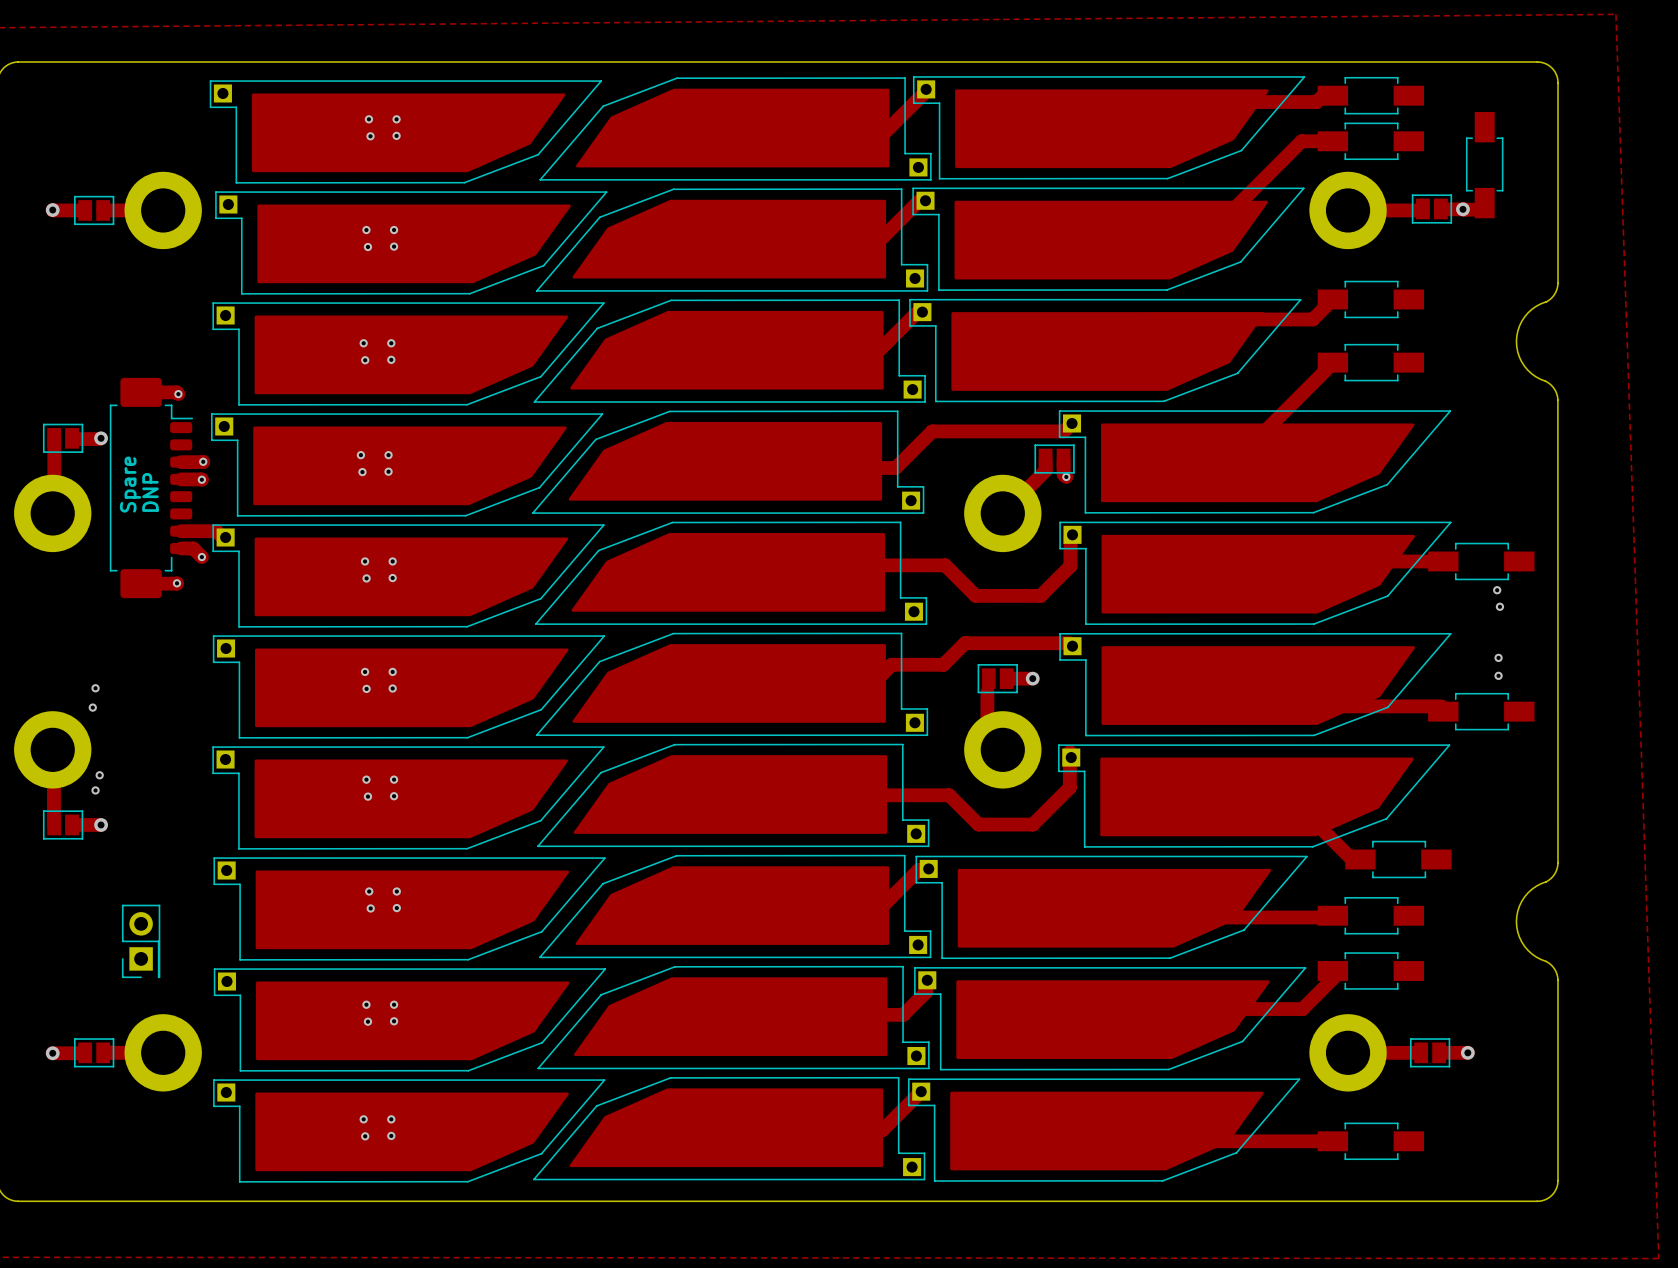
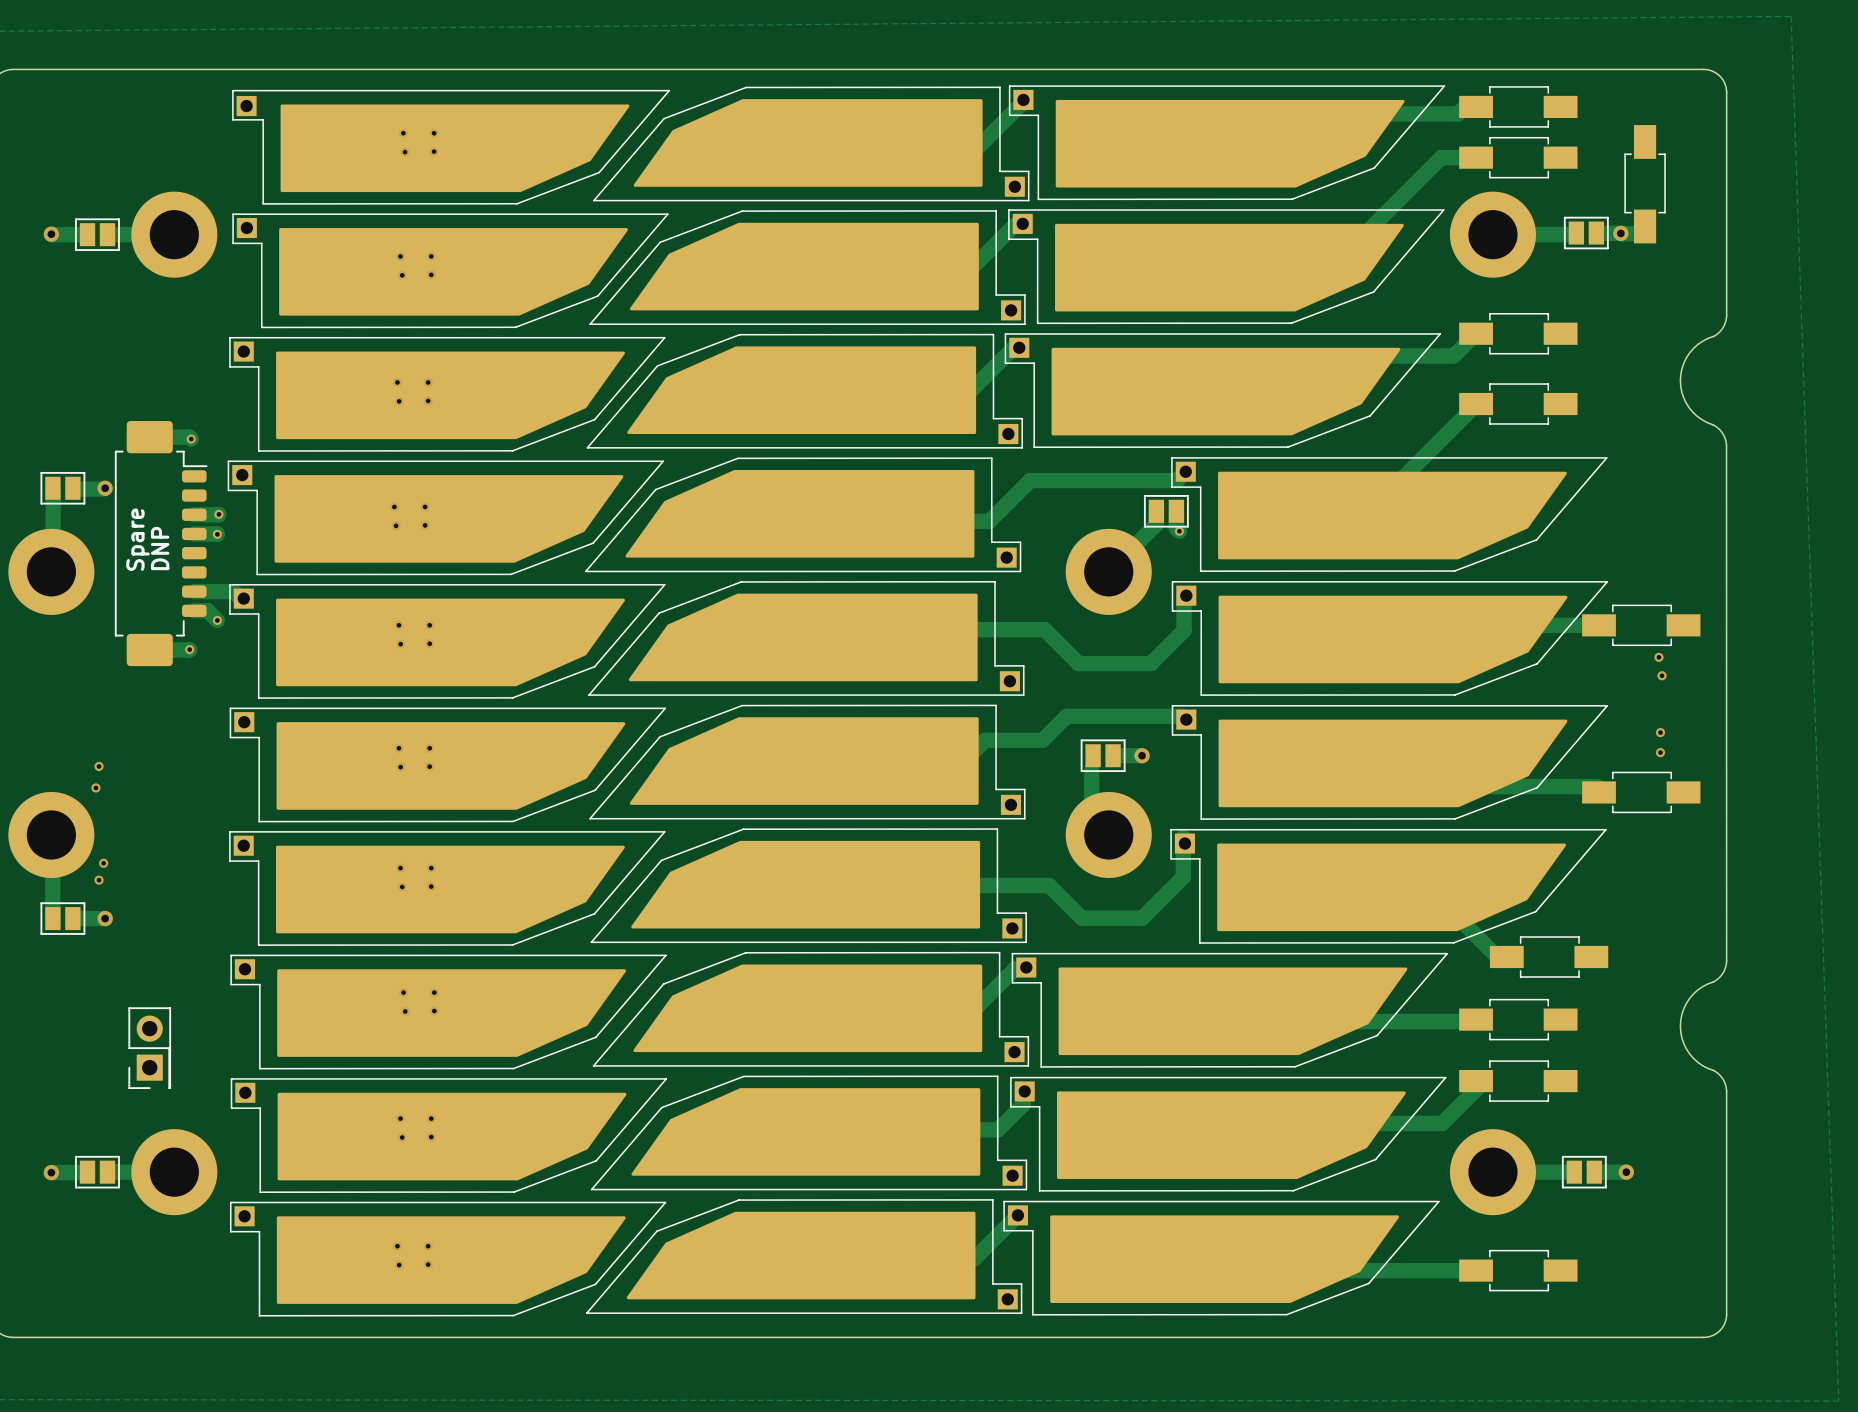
part footprint: [209, 80, 602, 184] -> [232, 89, 670, 205]

